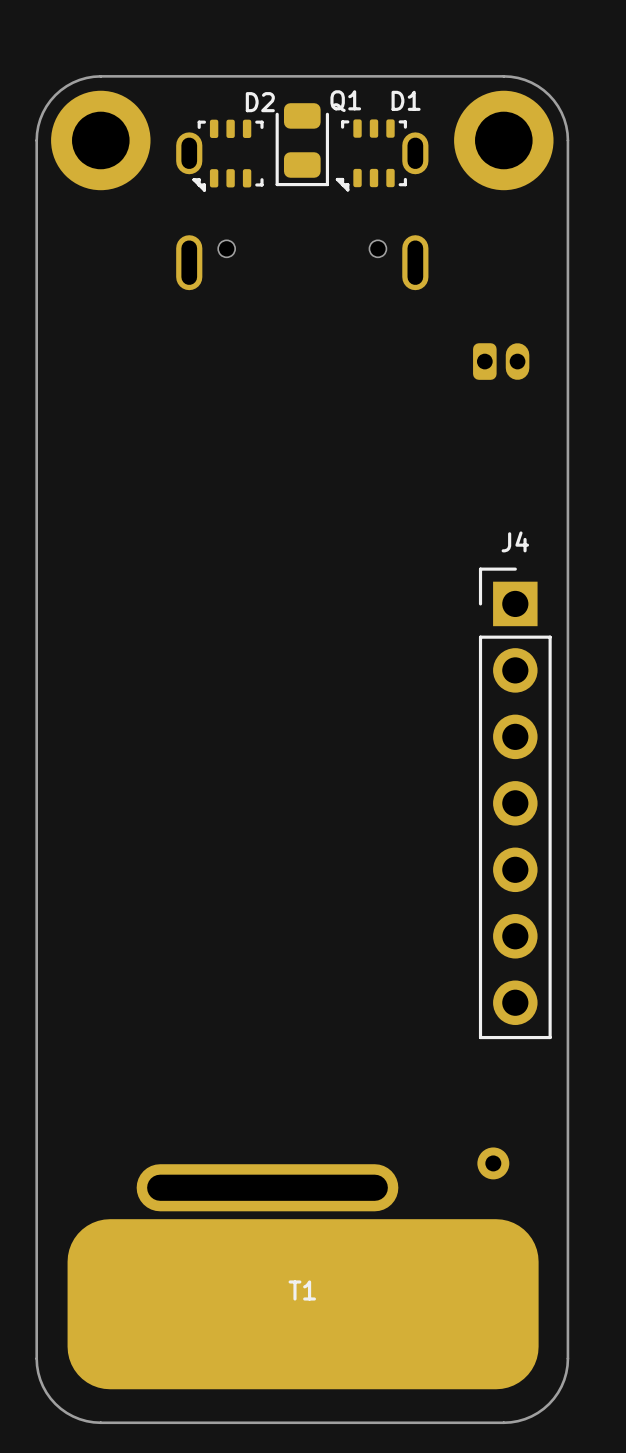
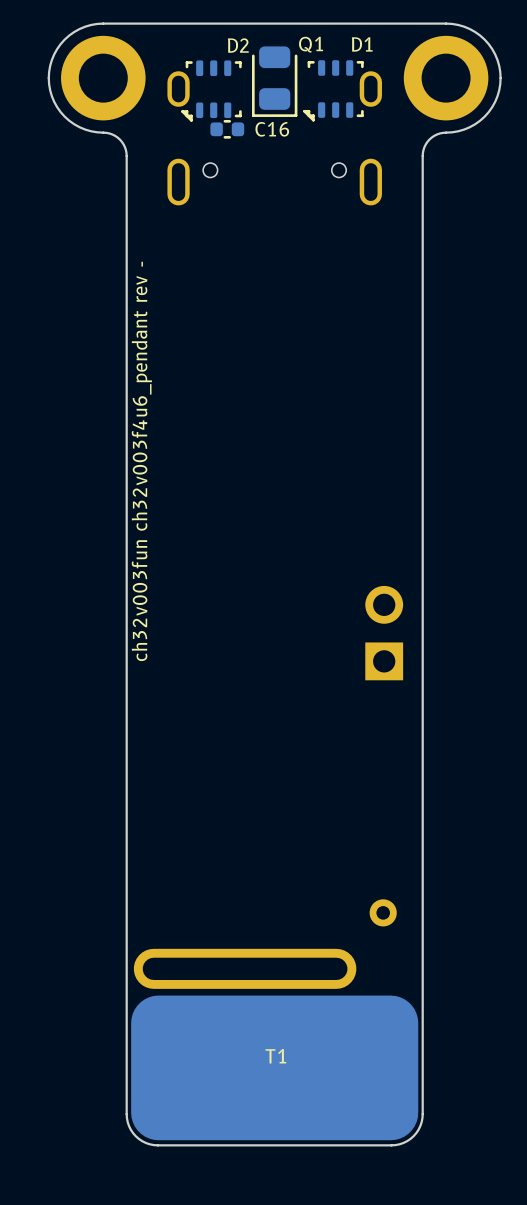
board edge: (567, 140) (567, 1358) (566, 1372) (561, 1386) (549, 1403) (537, 1412) (524, 1419) (503, 1422) (93, 1422) (79, 1419) (60, 1408) (46, 1392) (40, 1379) (36, 1358) (36, 140) -> (500, 78) (497, 96) (484, 116) (464, 129) (434, 135) (425, 144) (422, 152) (422, 1114) (420, 1126) (413, 1136) (403, 1142) (391, 1145) (153, 1145) (145, 1142) (135, 1136) (127, 1122) (126, 152) (123, 144) (115, 135) (85, 129) (64, 116) (51, 96) (48, 78)
C16: none -> (227, 129)
part: (501, 361) -> none
text: none -> ch32v003fun ch32v003f4u6_pendant rev - (141, 461)
part: none -> (384, 633)
J4: (515, 803) -> none
part position: (493, 1163) -> (383, 912)
T1 footprint: [67, 1219, 539, 1390] -> [131, 995, 419, 1141]

